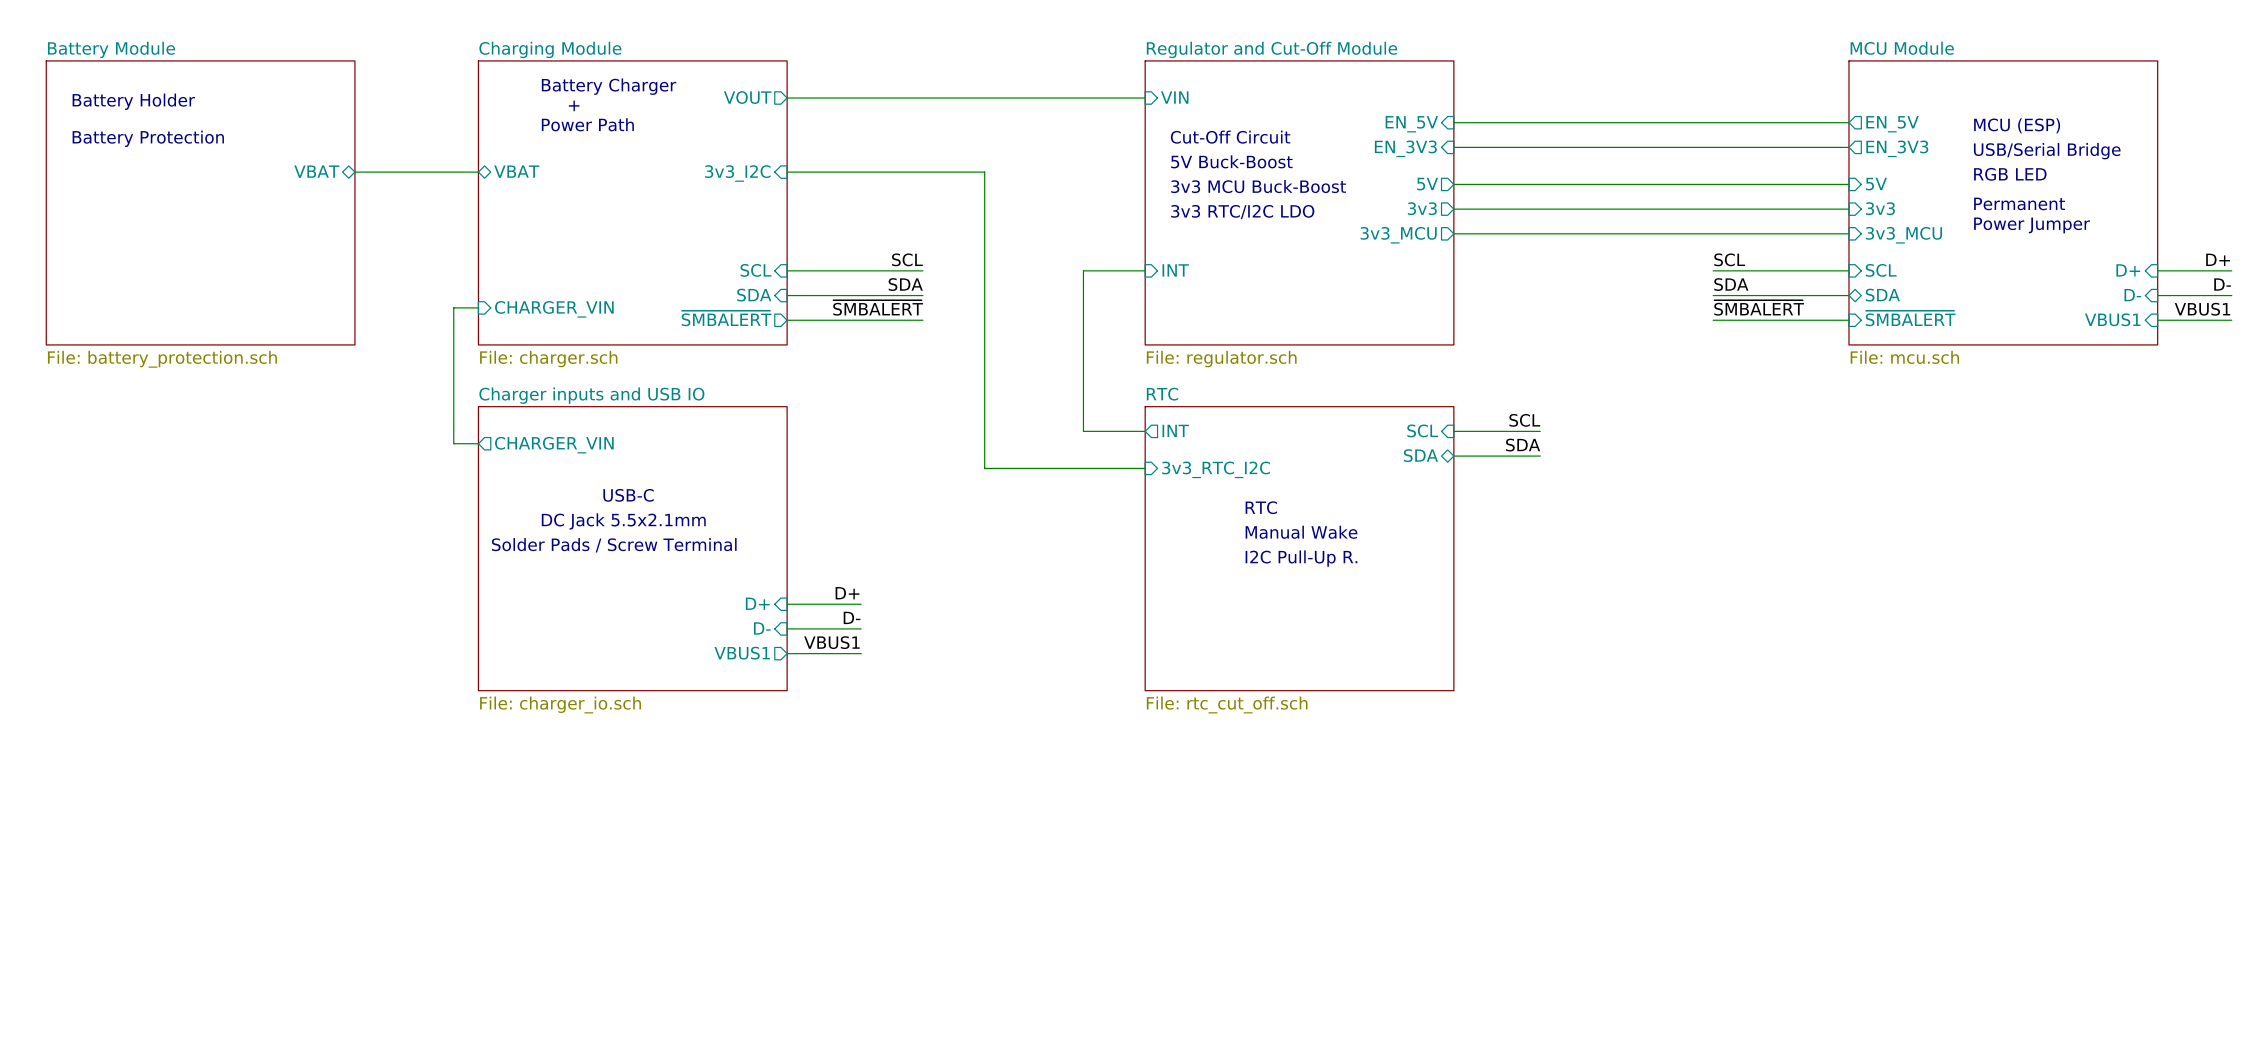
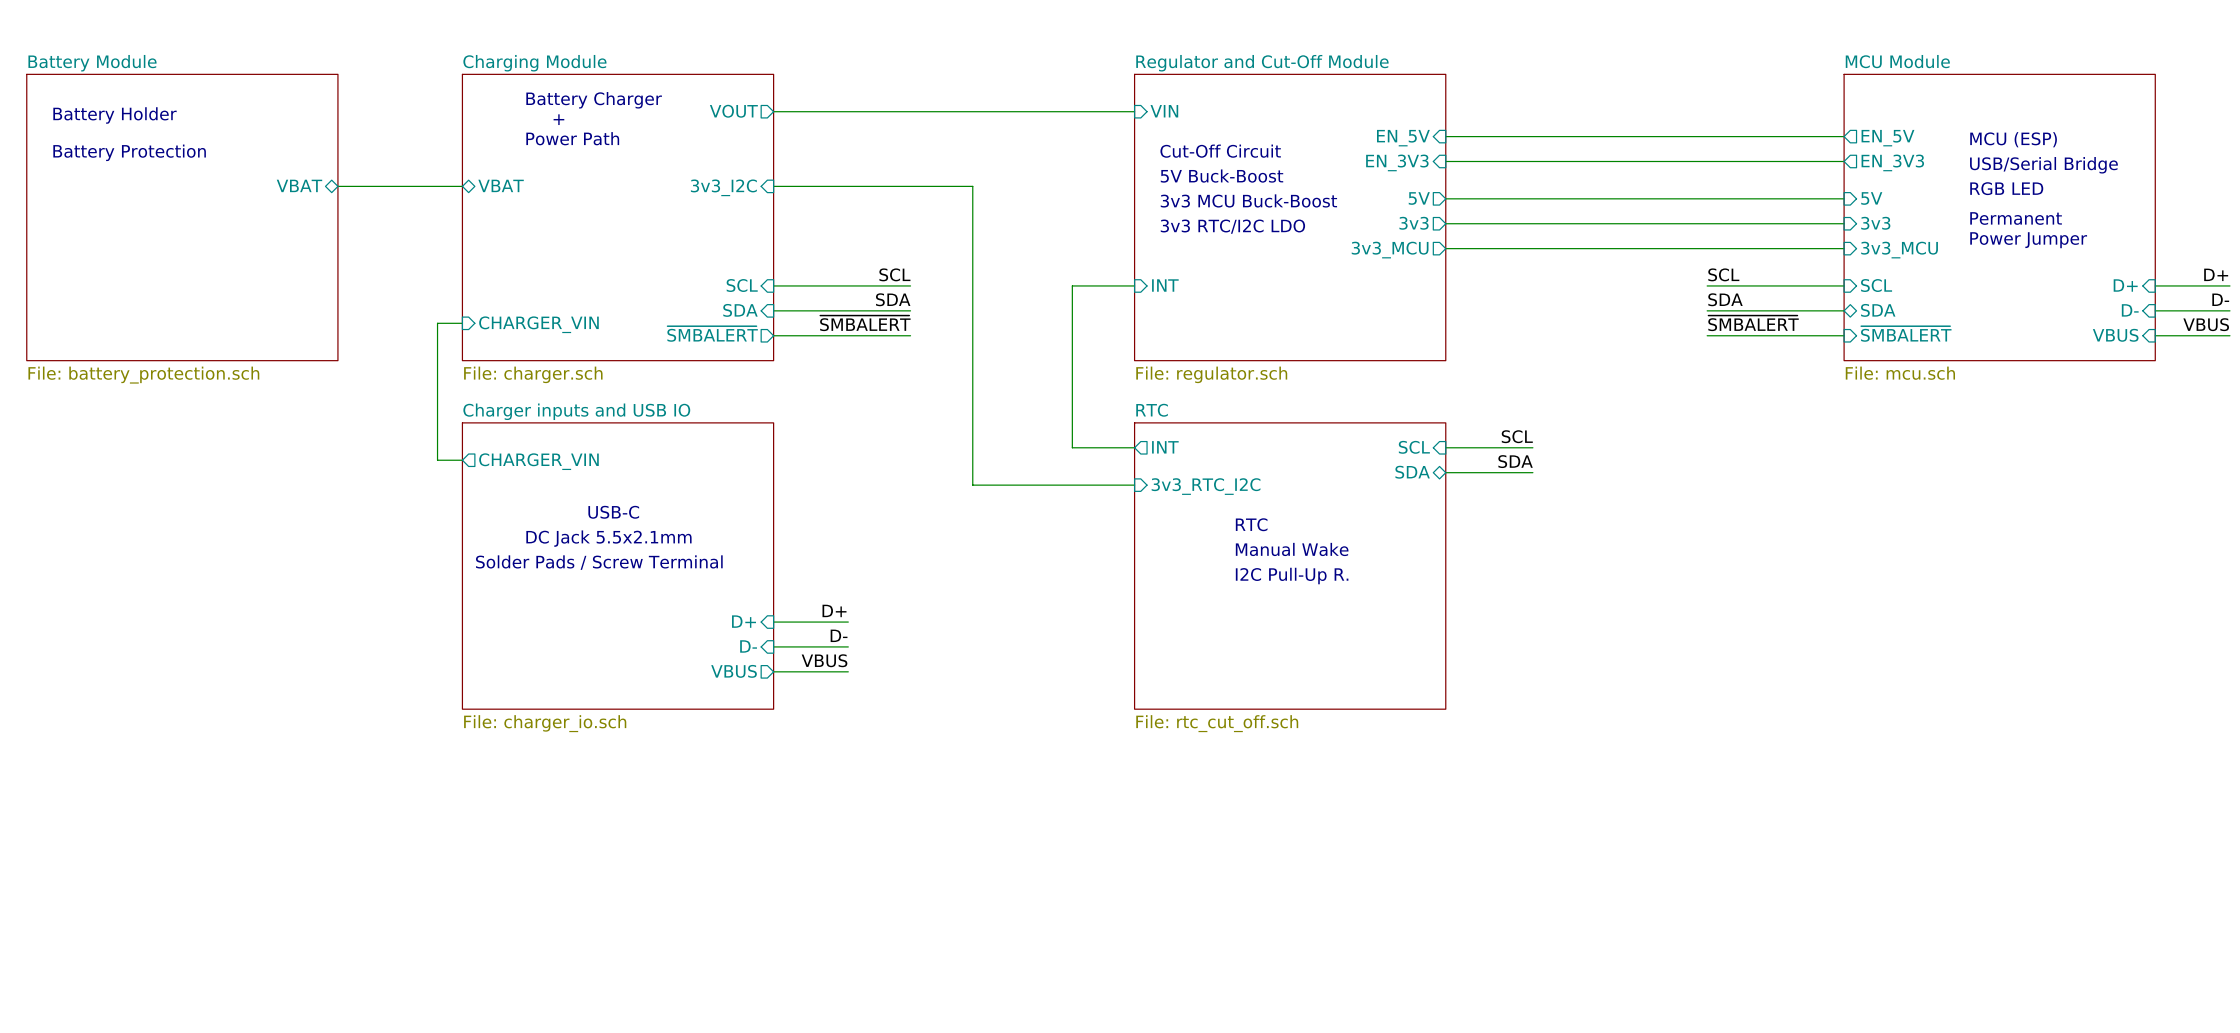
label: VBUS1 (2202, 309) -> VBUS (2206, 324)
sheet pin: VBUS1 (2112, 319) -> VBUS (2115, 335)
label: VBUS1 (831, 642) -> VBUS (824, 660)
sheet pin: VBUS1 (742, 653) -> VBUS (734, 671)

